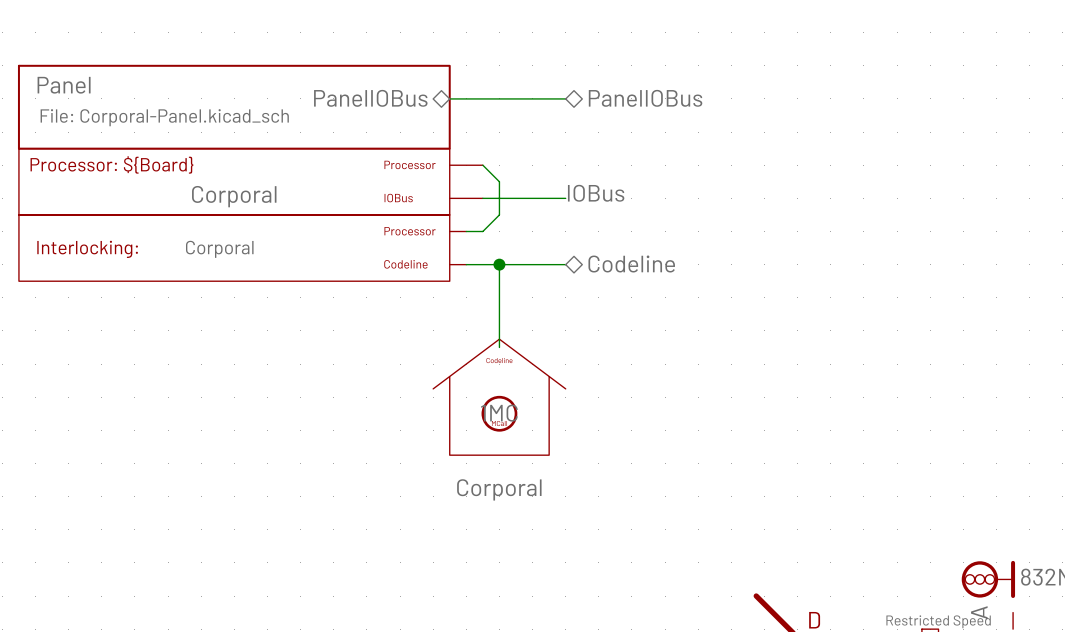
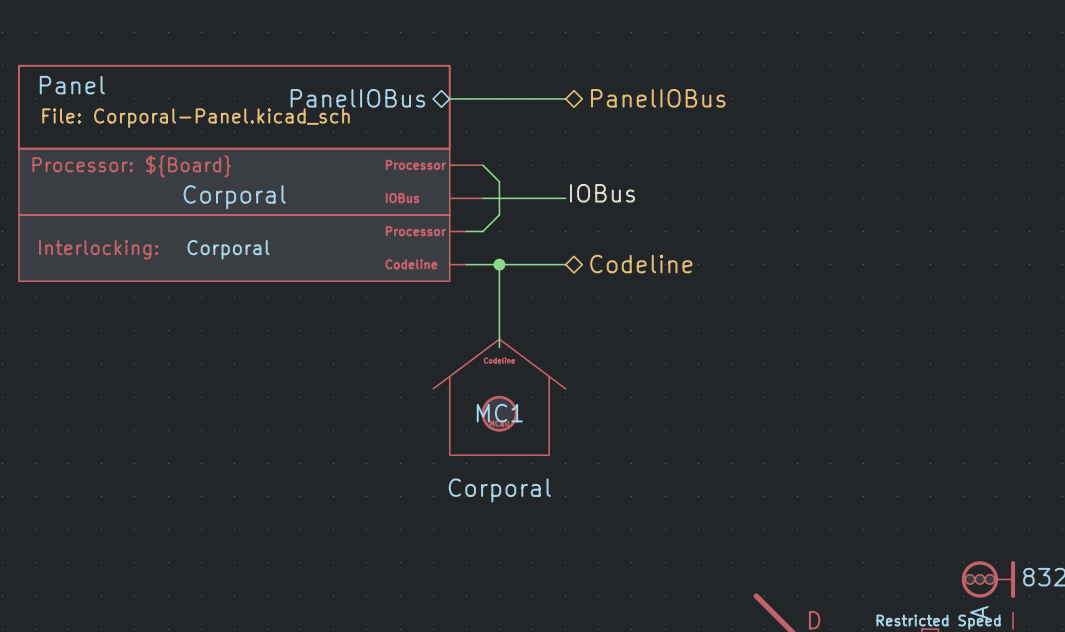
part text: 1MC (499, 413) -> none
part value: none -> MC1 (499, 413)

